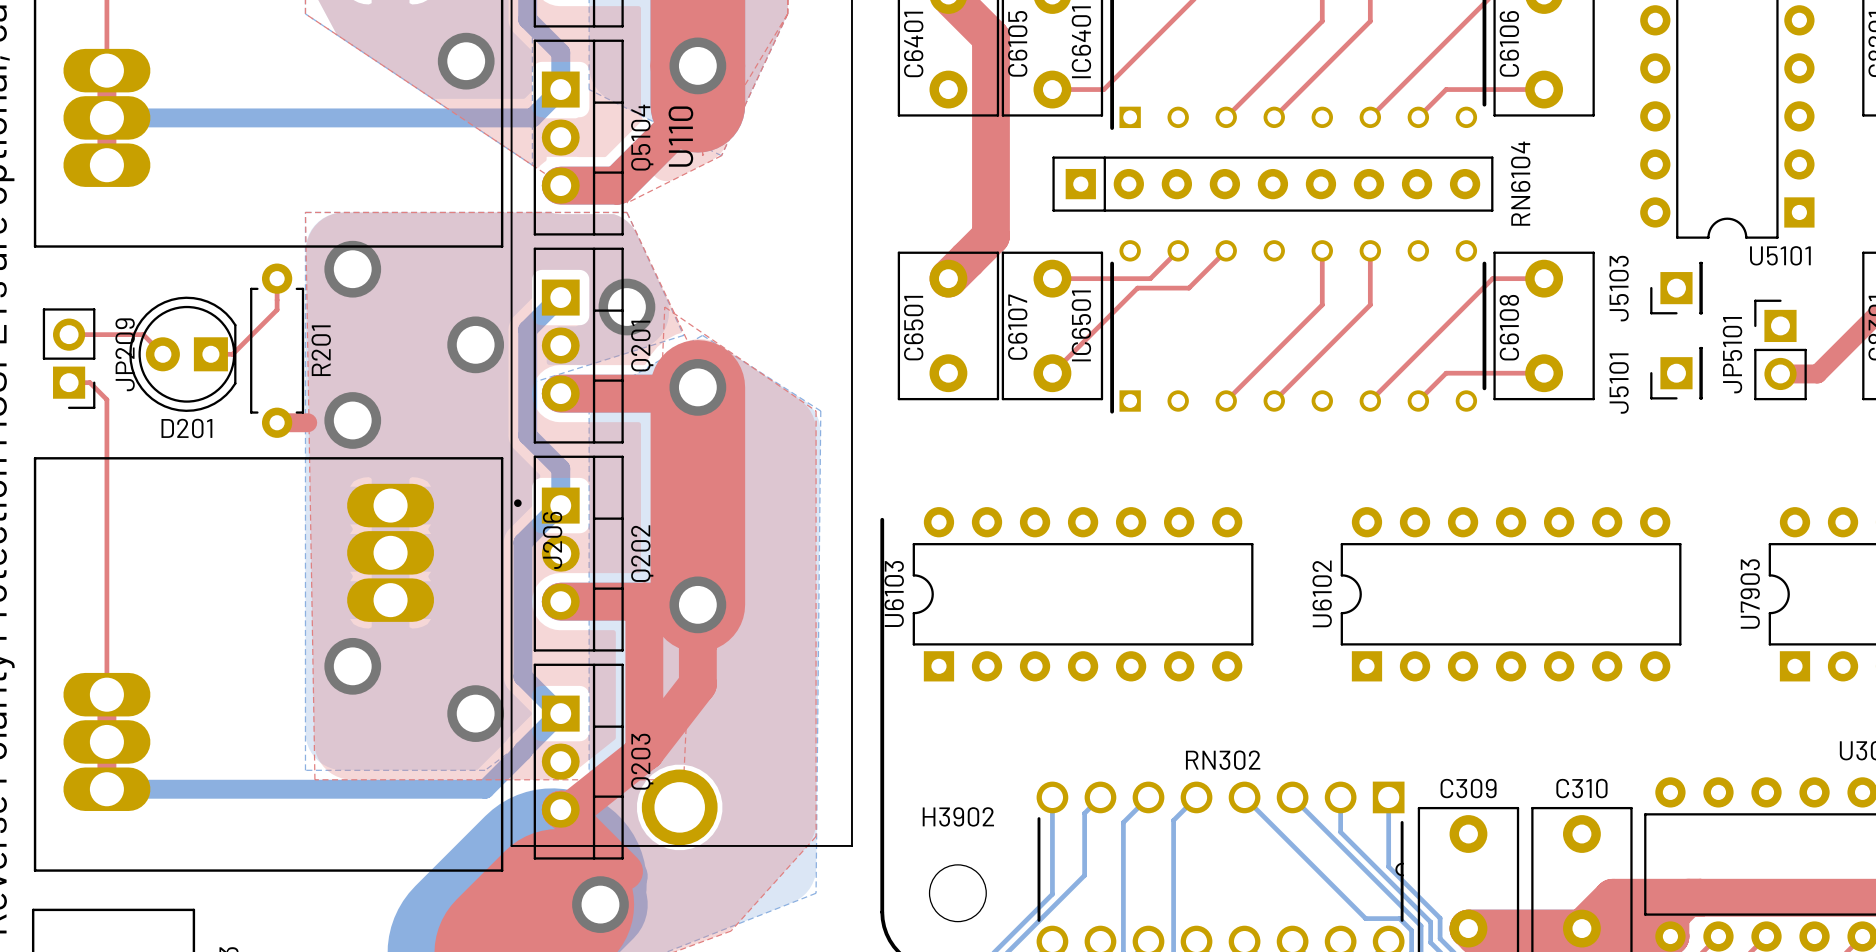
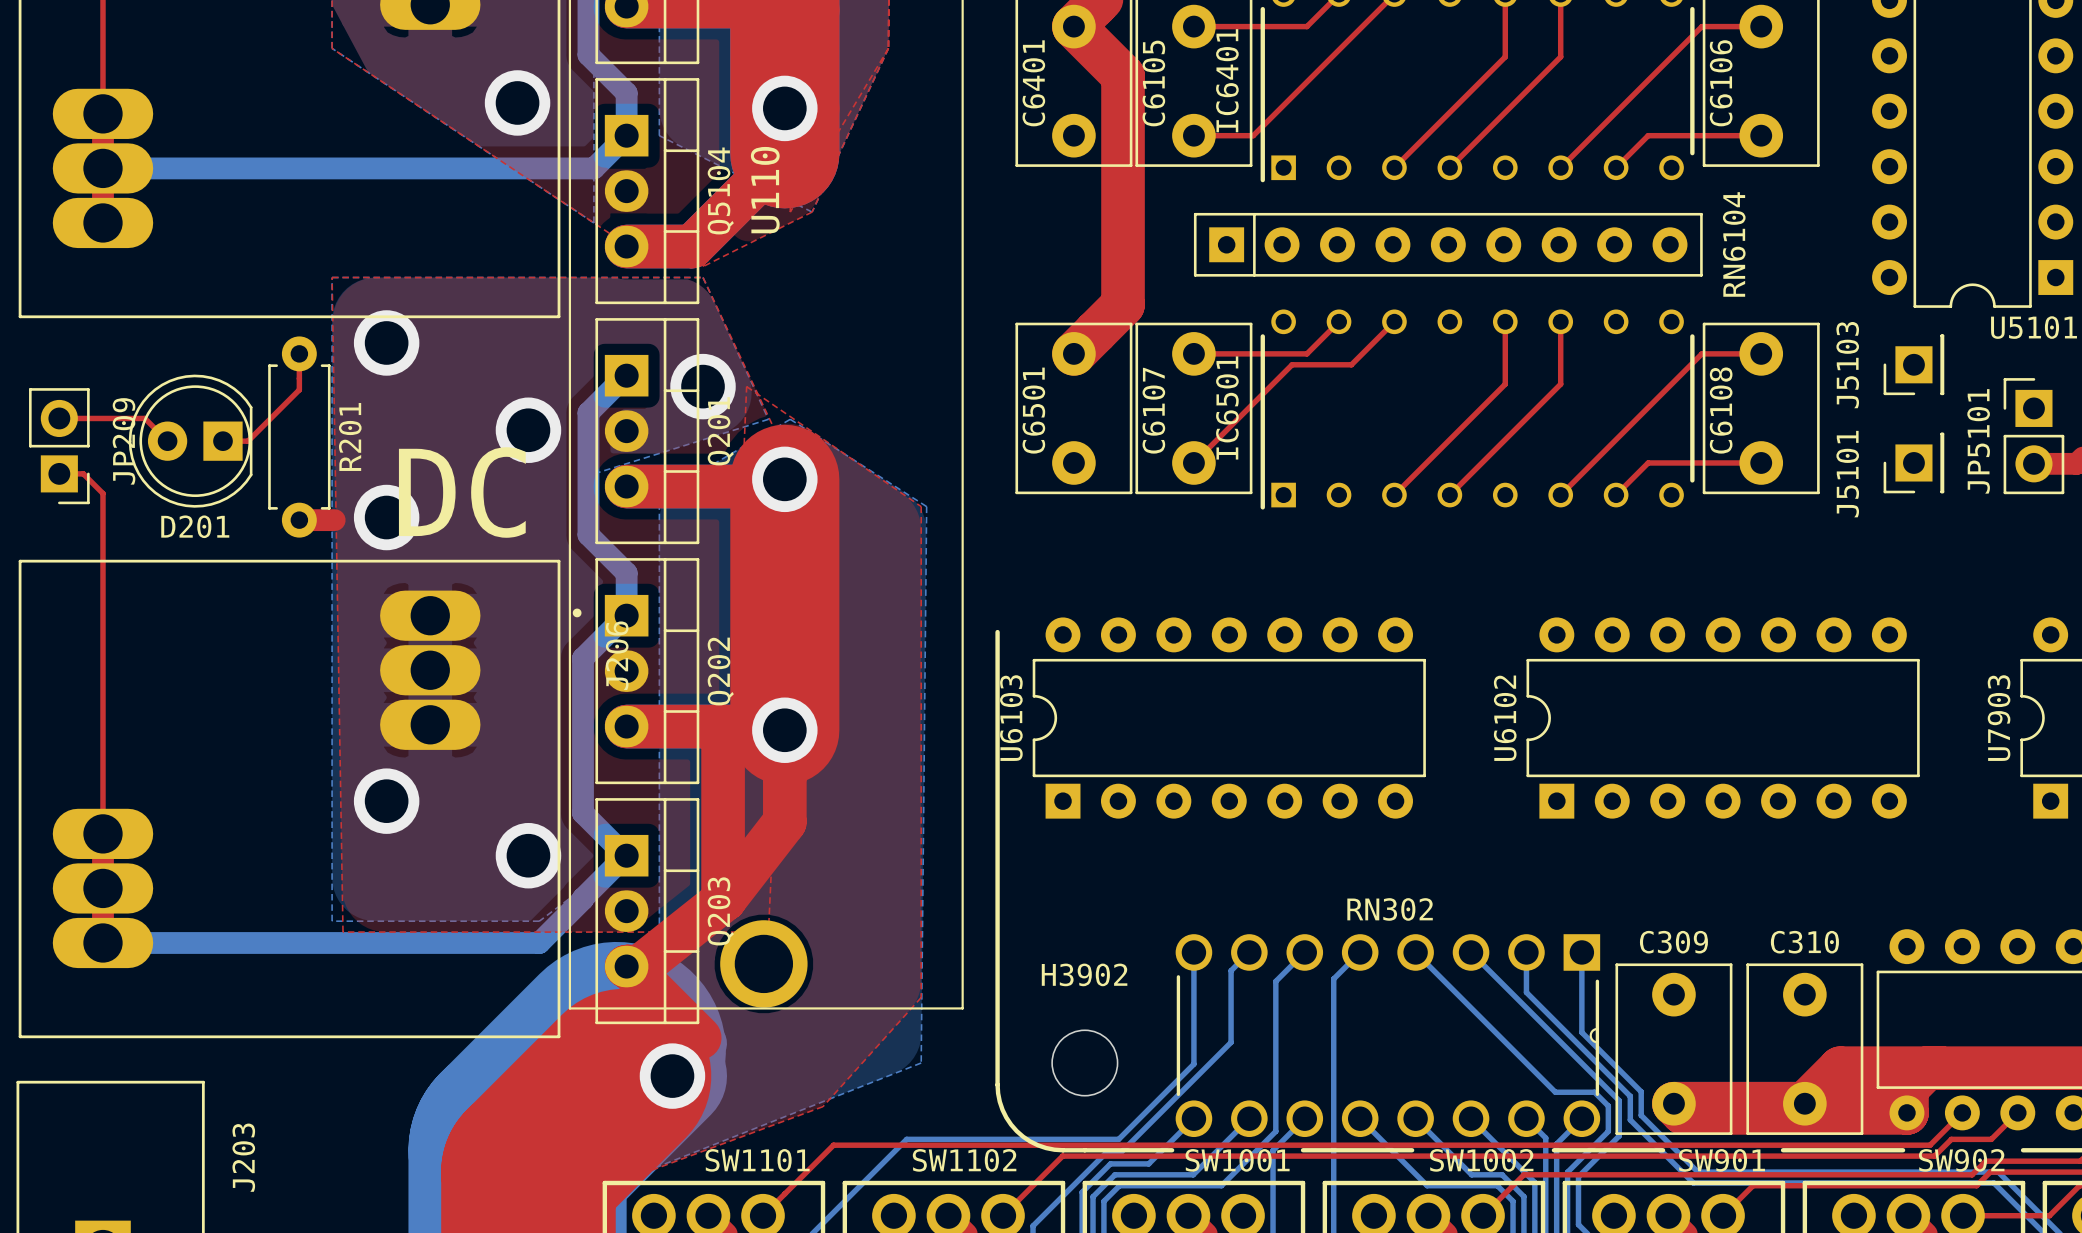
text: none -> DC (462, 492)

